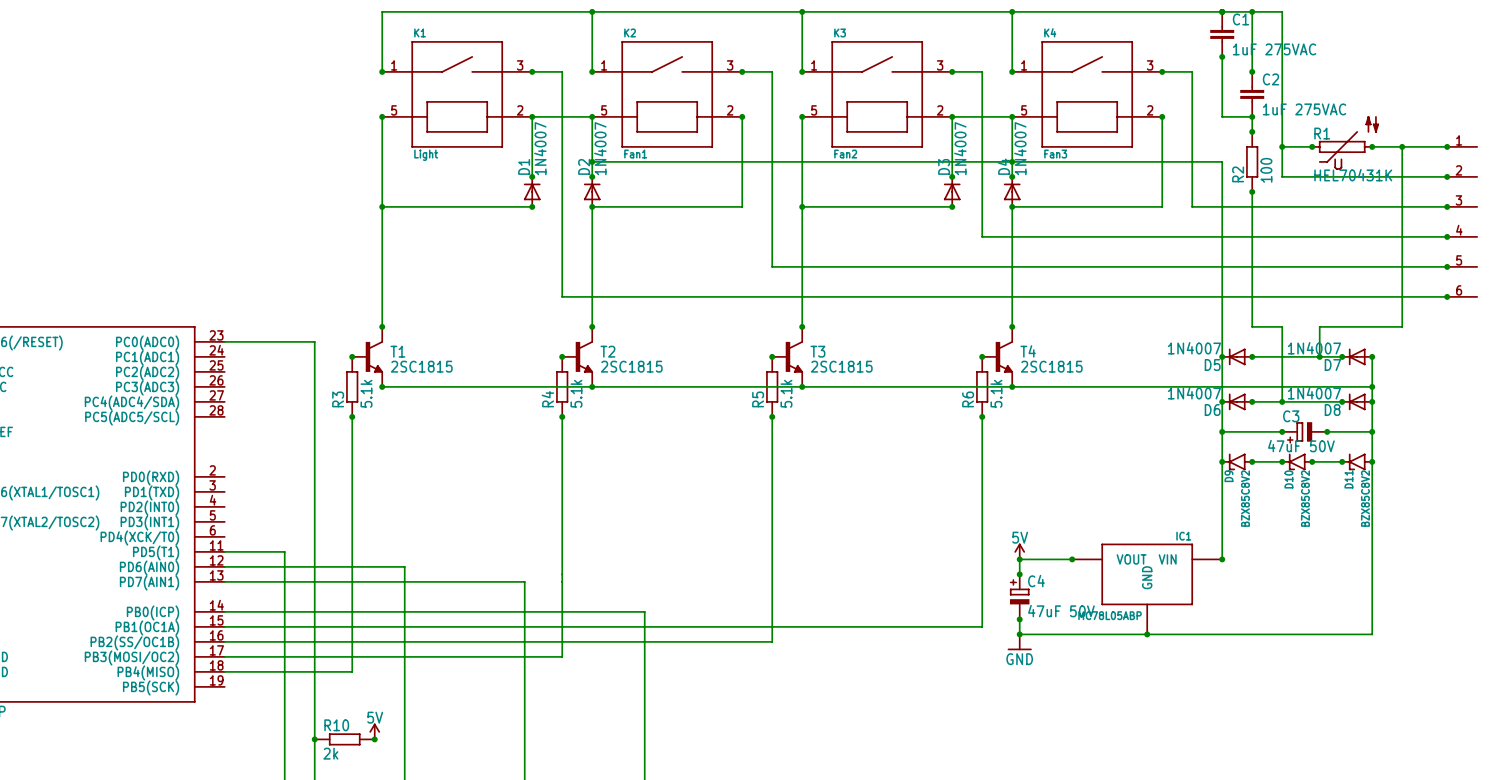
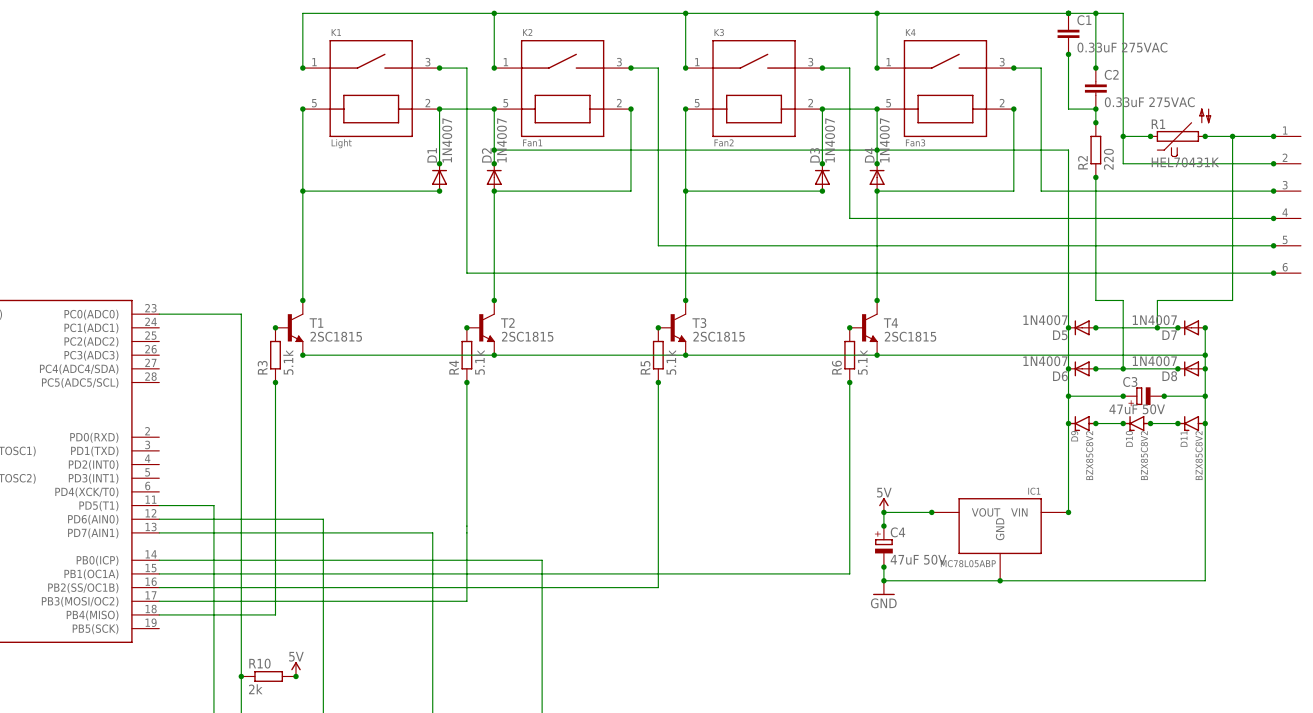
C1 value: 1uF 275VAC (1274, 49) -> 0.33uF 275VAC (1122, 47)
C2 value: 1uF 275VAC (1304, 109) -> 0.33uF 275VAC (1149, 102)
R2 value: 100 (1266, 170) -> 220 (1108, 159)

